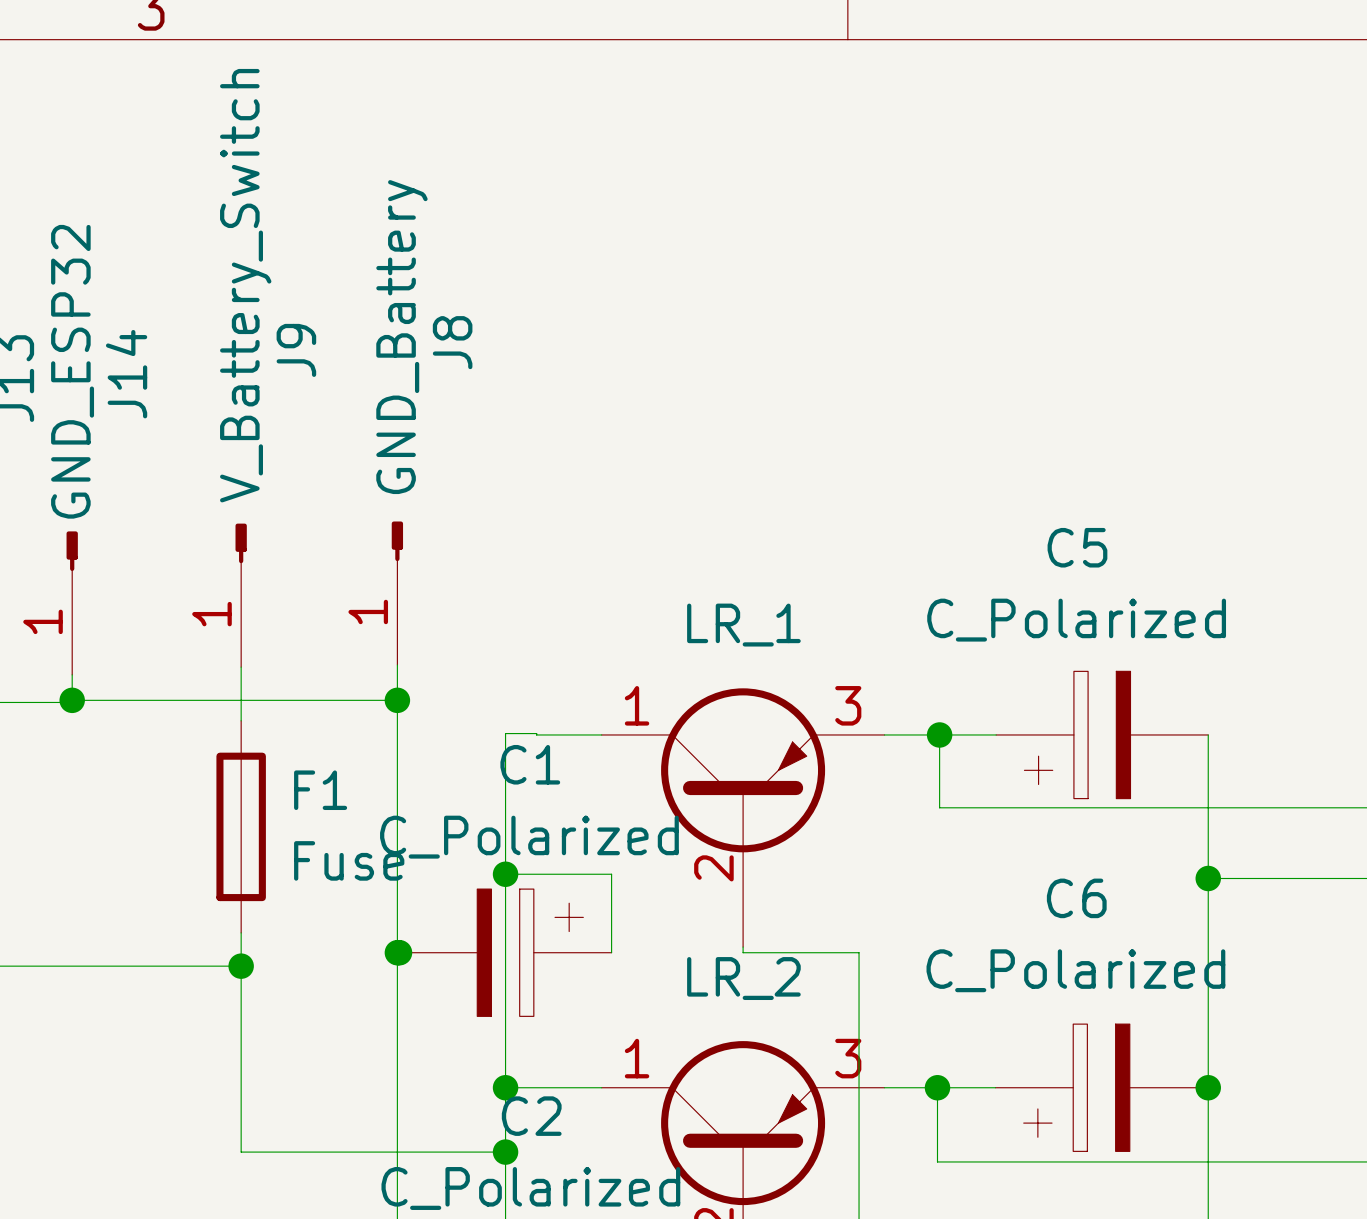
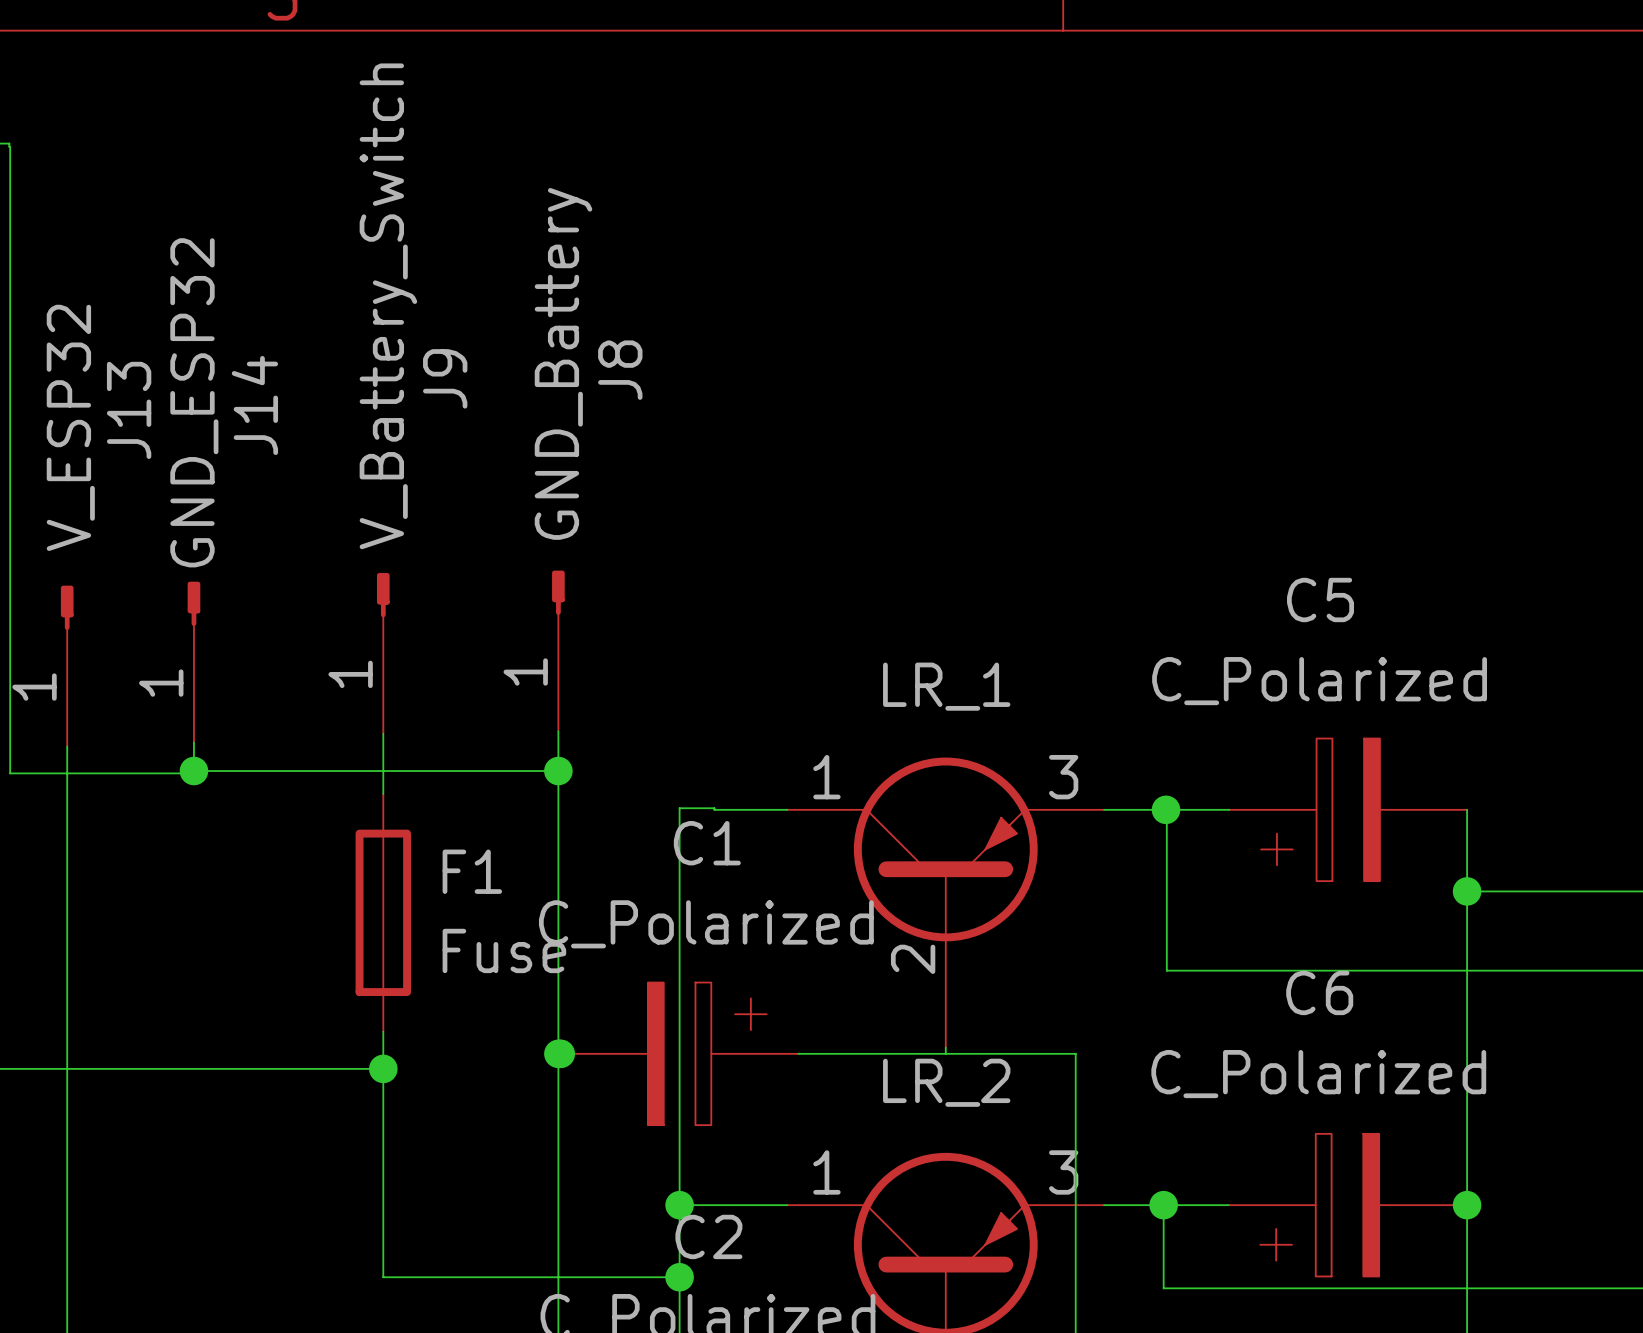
wire: (939, 734) (939, 807) (1208, 807) -> (1166, 809) (1166, 970) (1467, 970)
wire: (505, 874) (611, 874) (611, 952) -> (945, 1053) (798, 1053)
junction: (505, 874) -> none
junction position: (1208, 878) -> (1467, 891)

